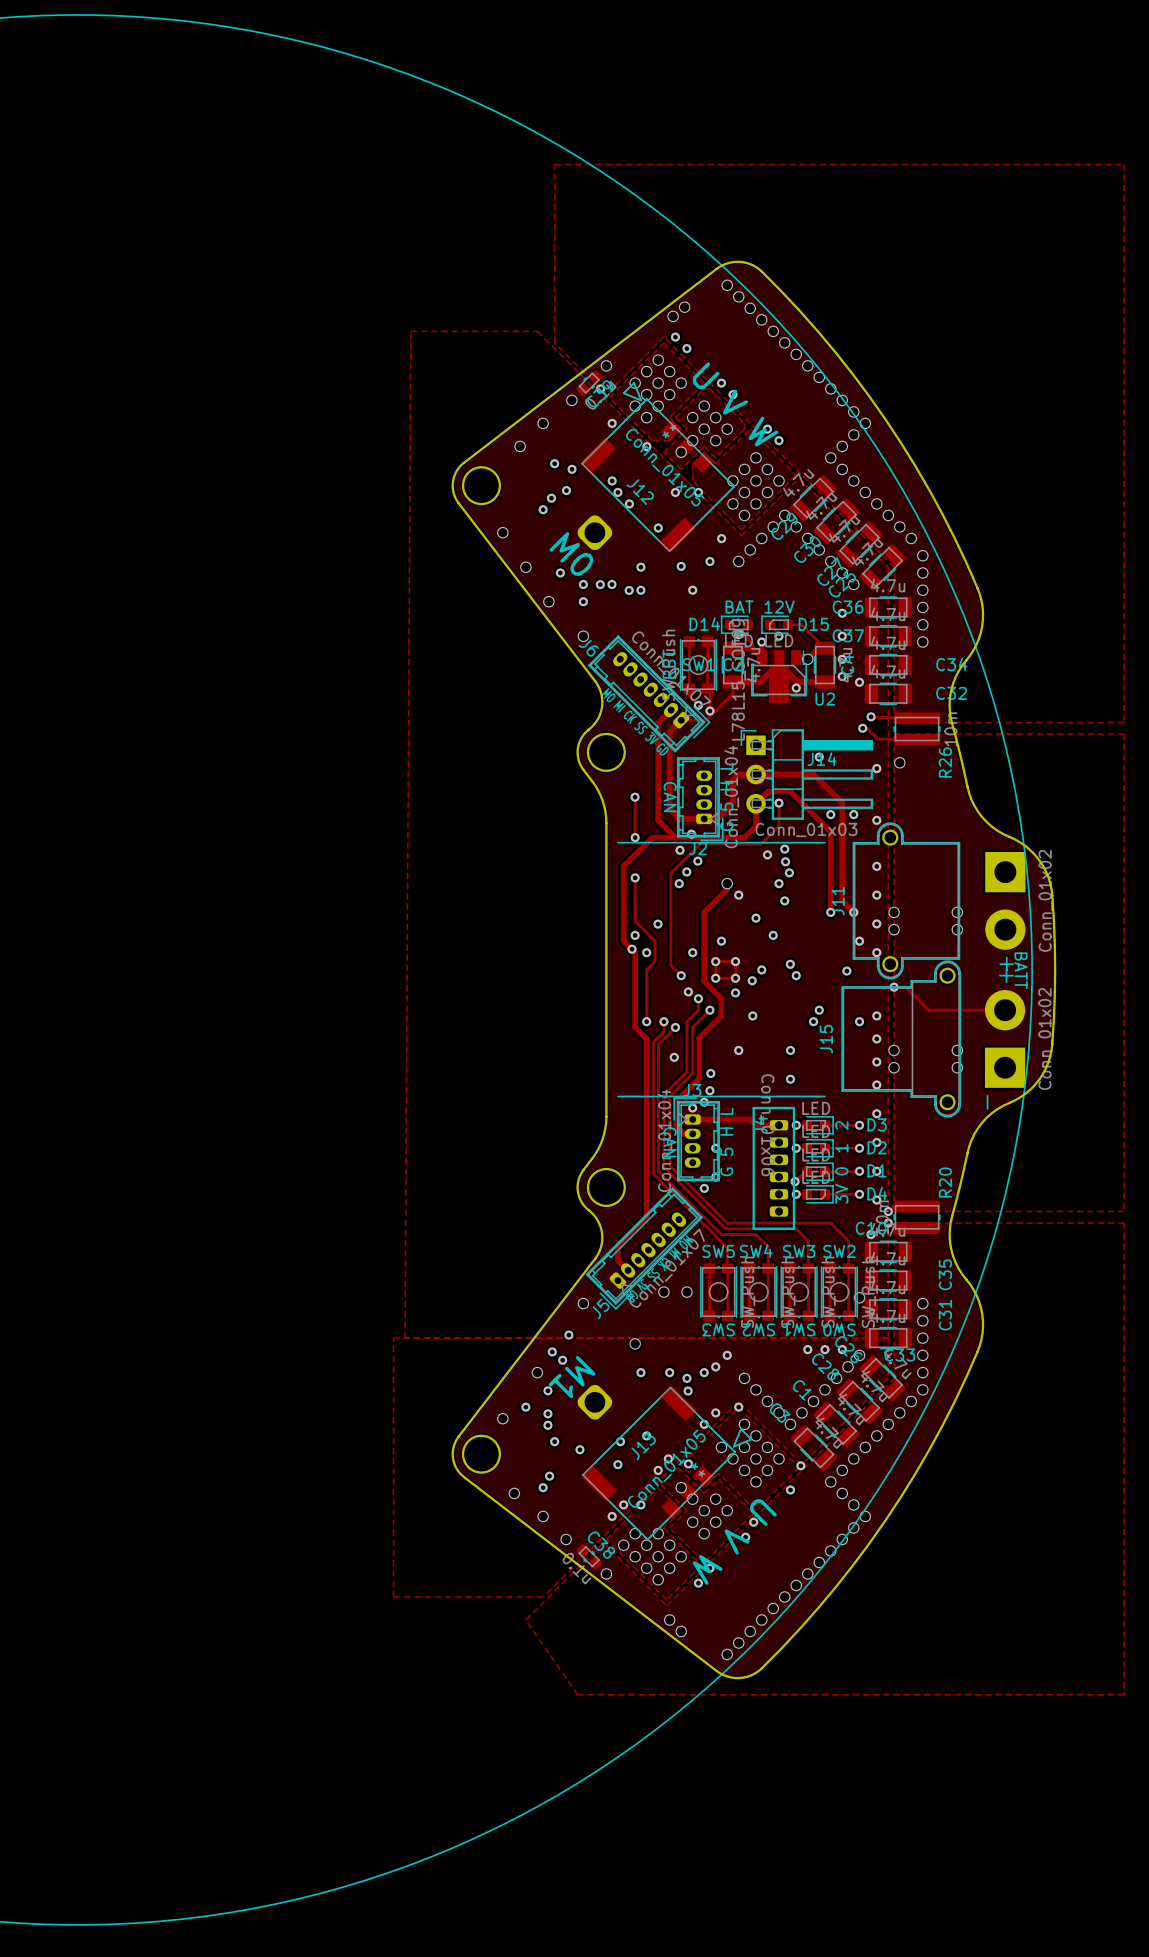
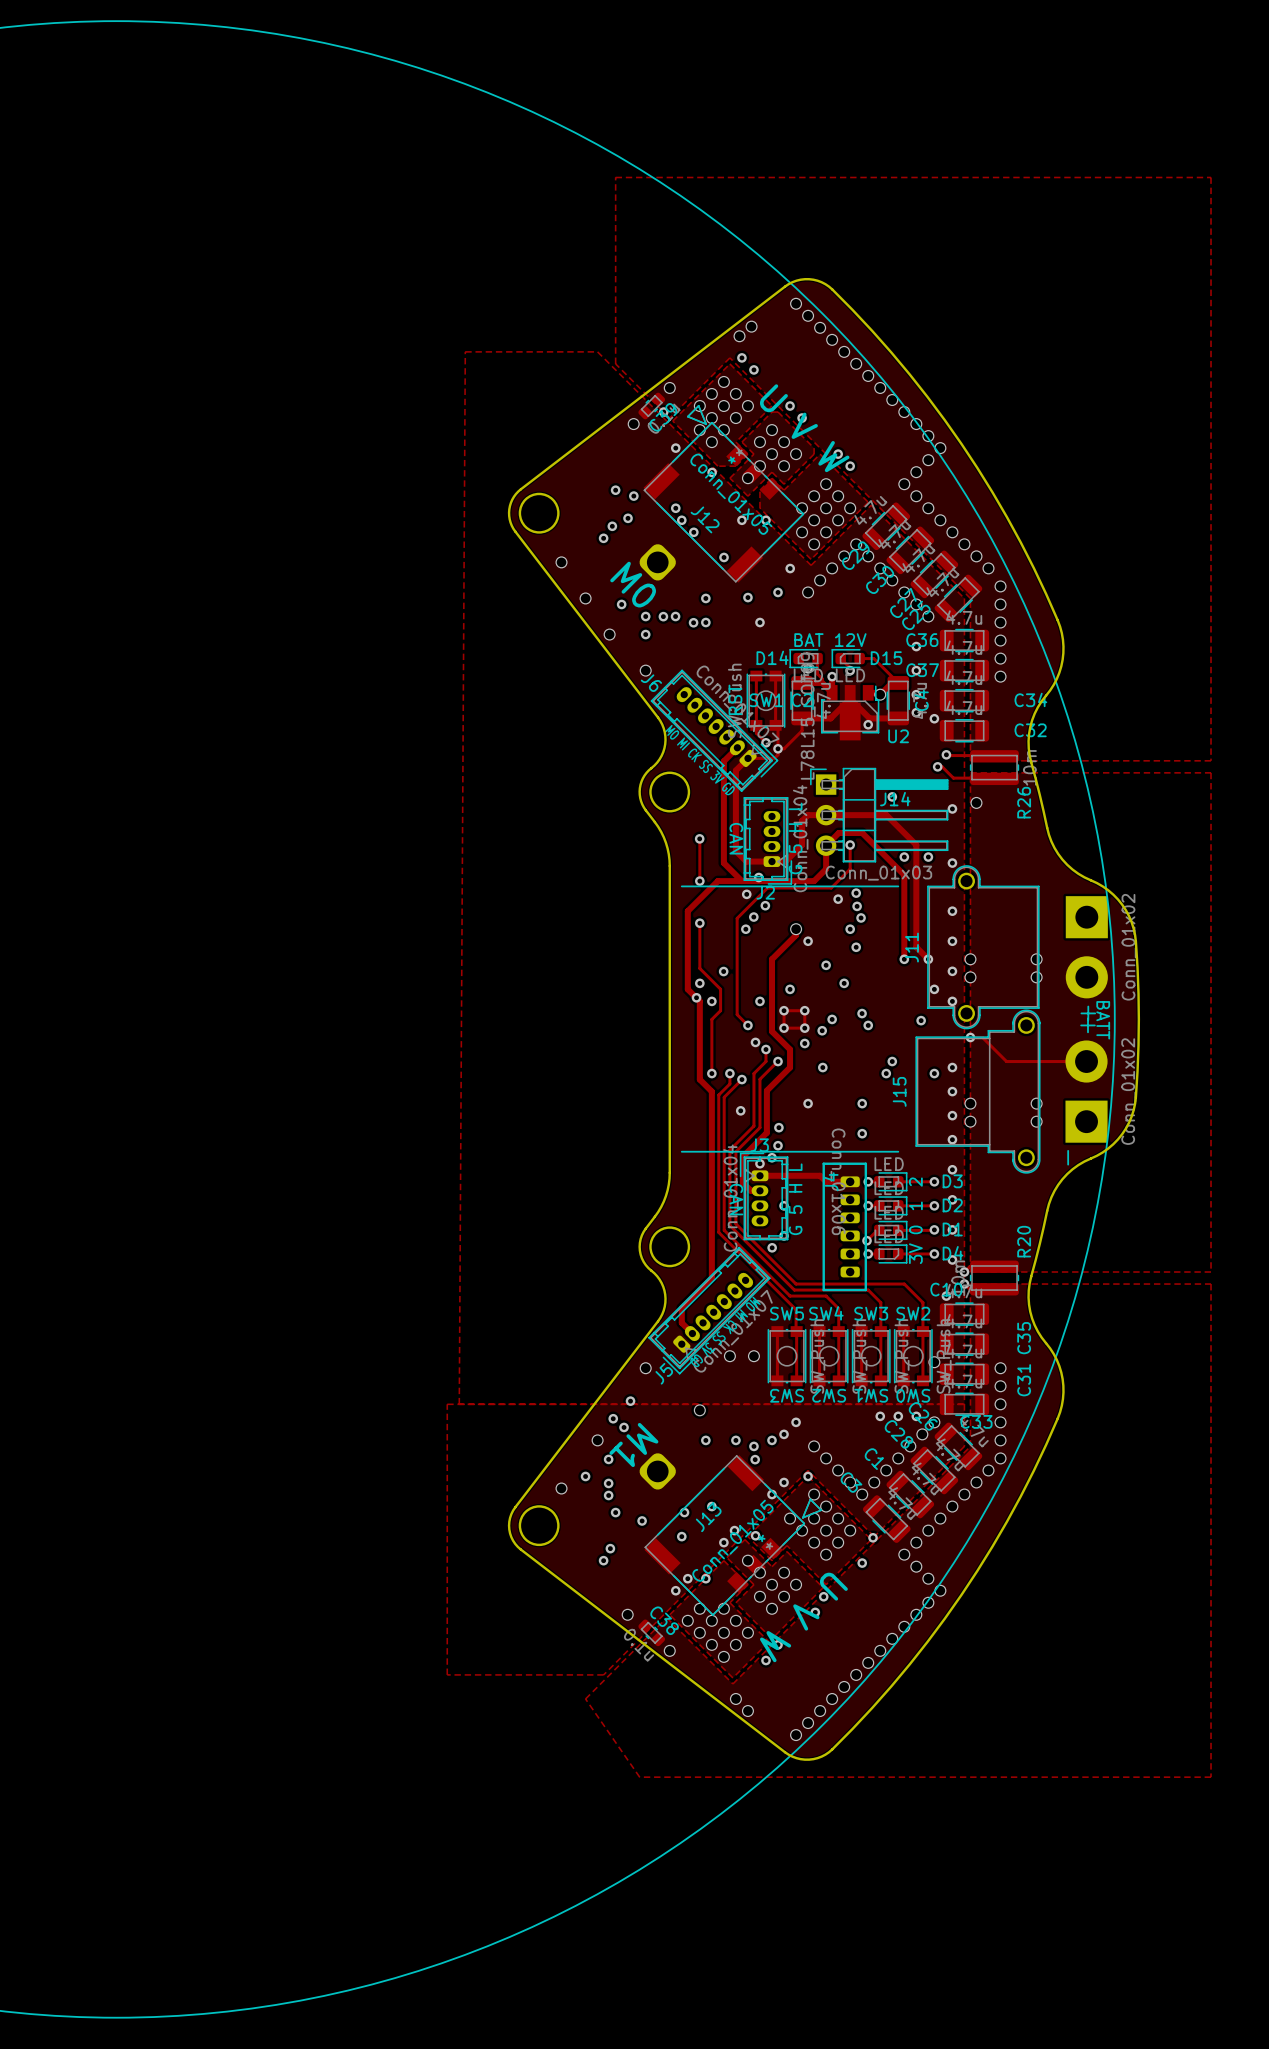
via: (543, 423) -> none
via: (520, 446) -> none
via: (514, 1493) -> none
via: (543, 1516) -> none

